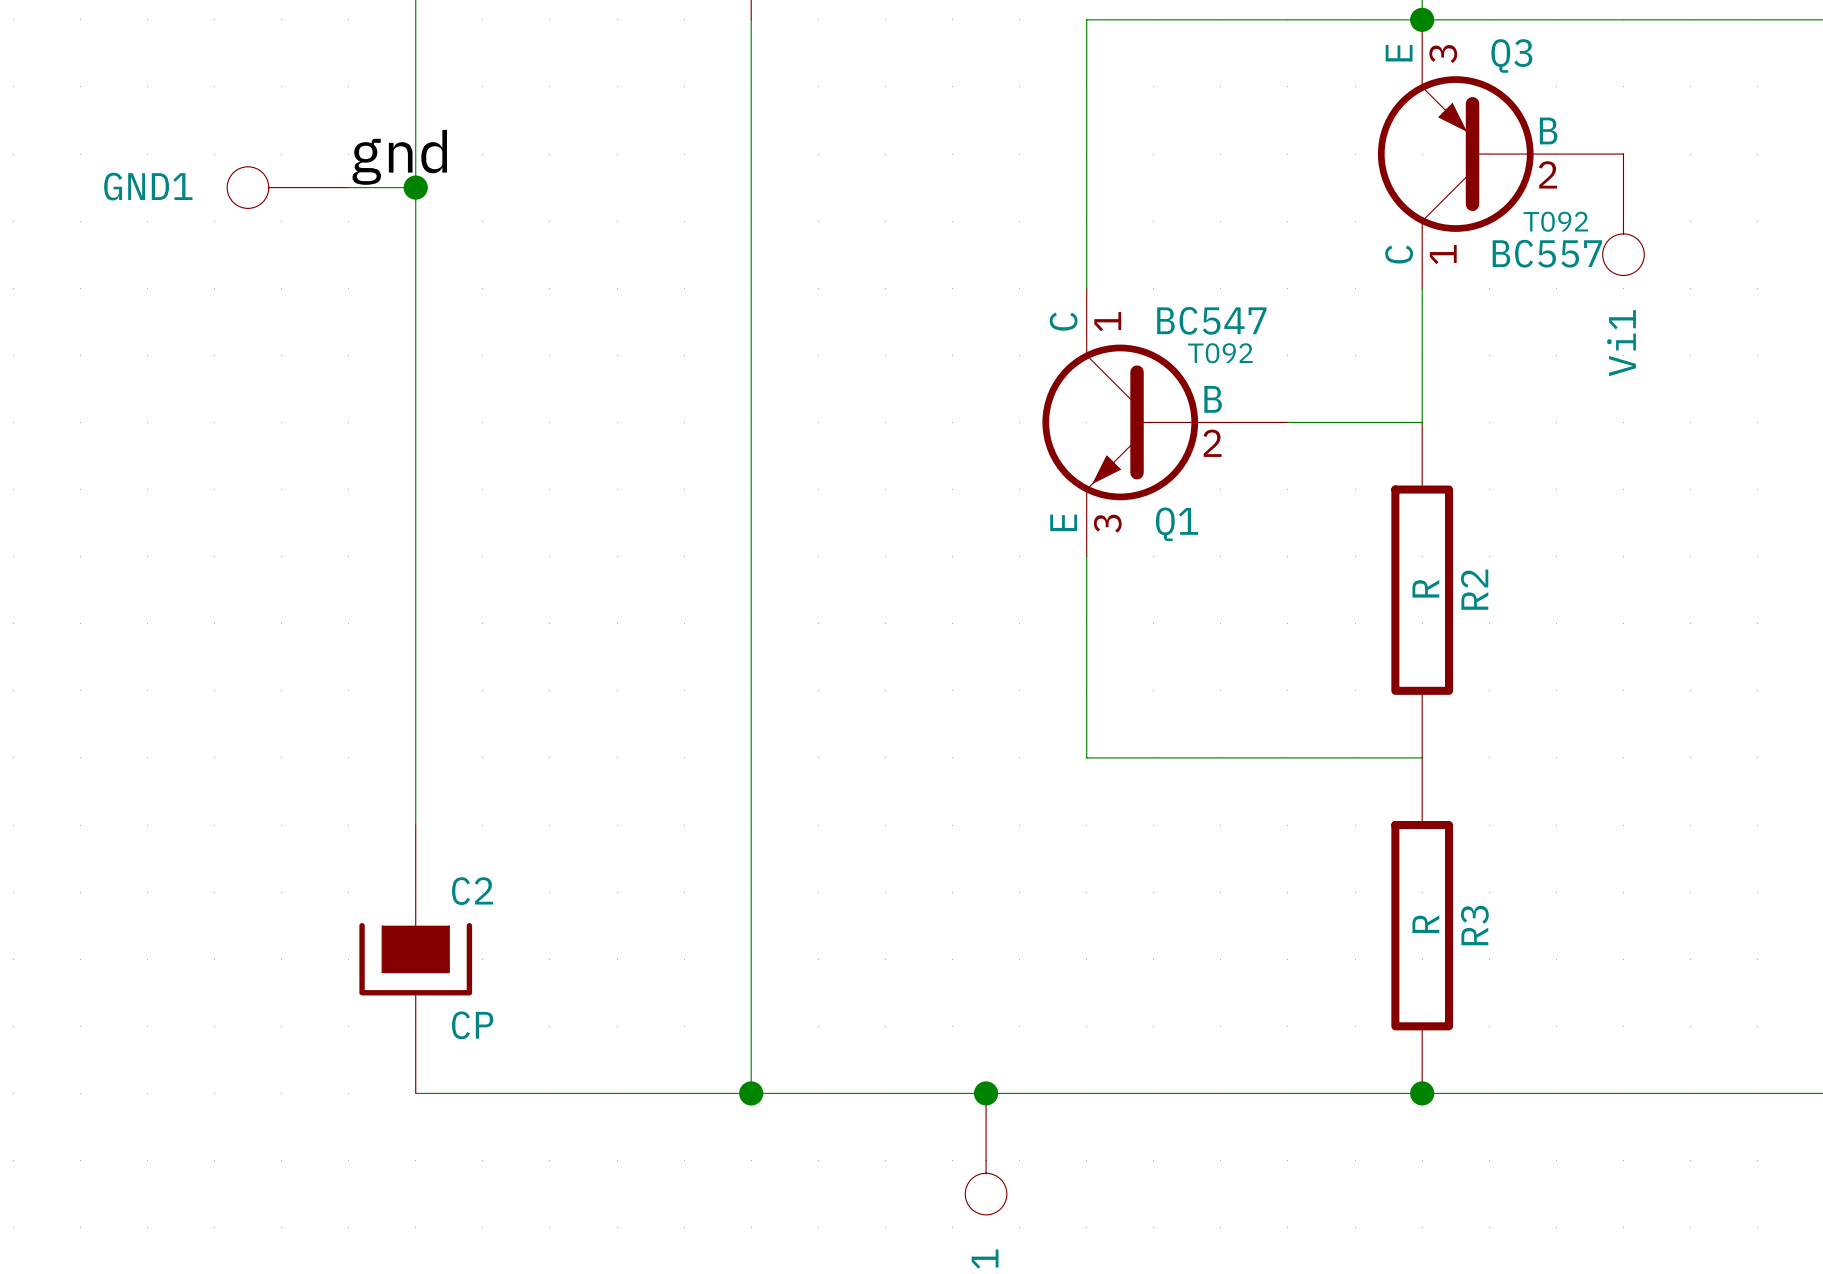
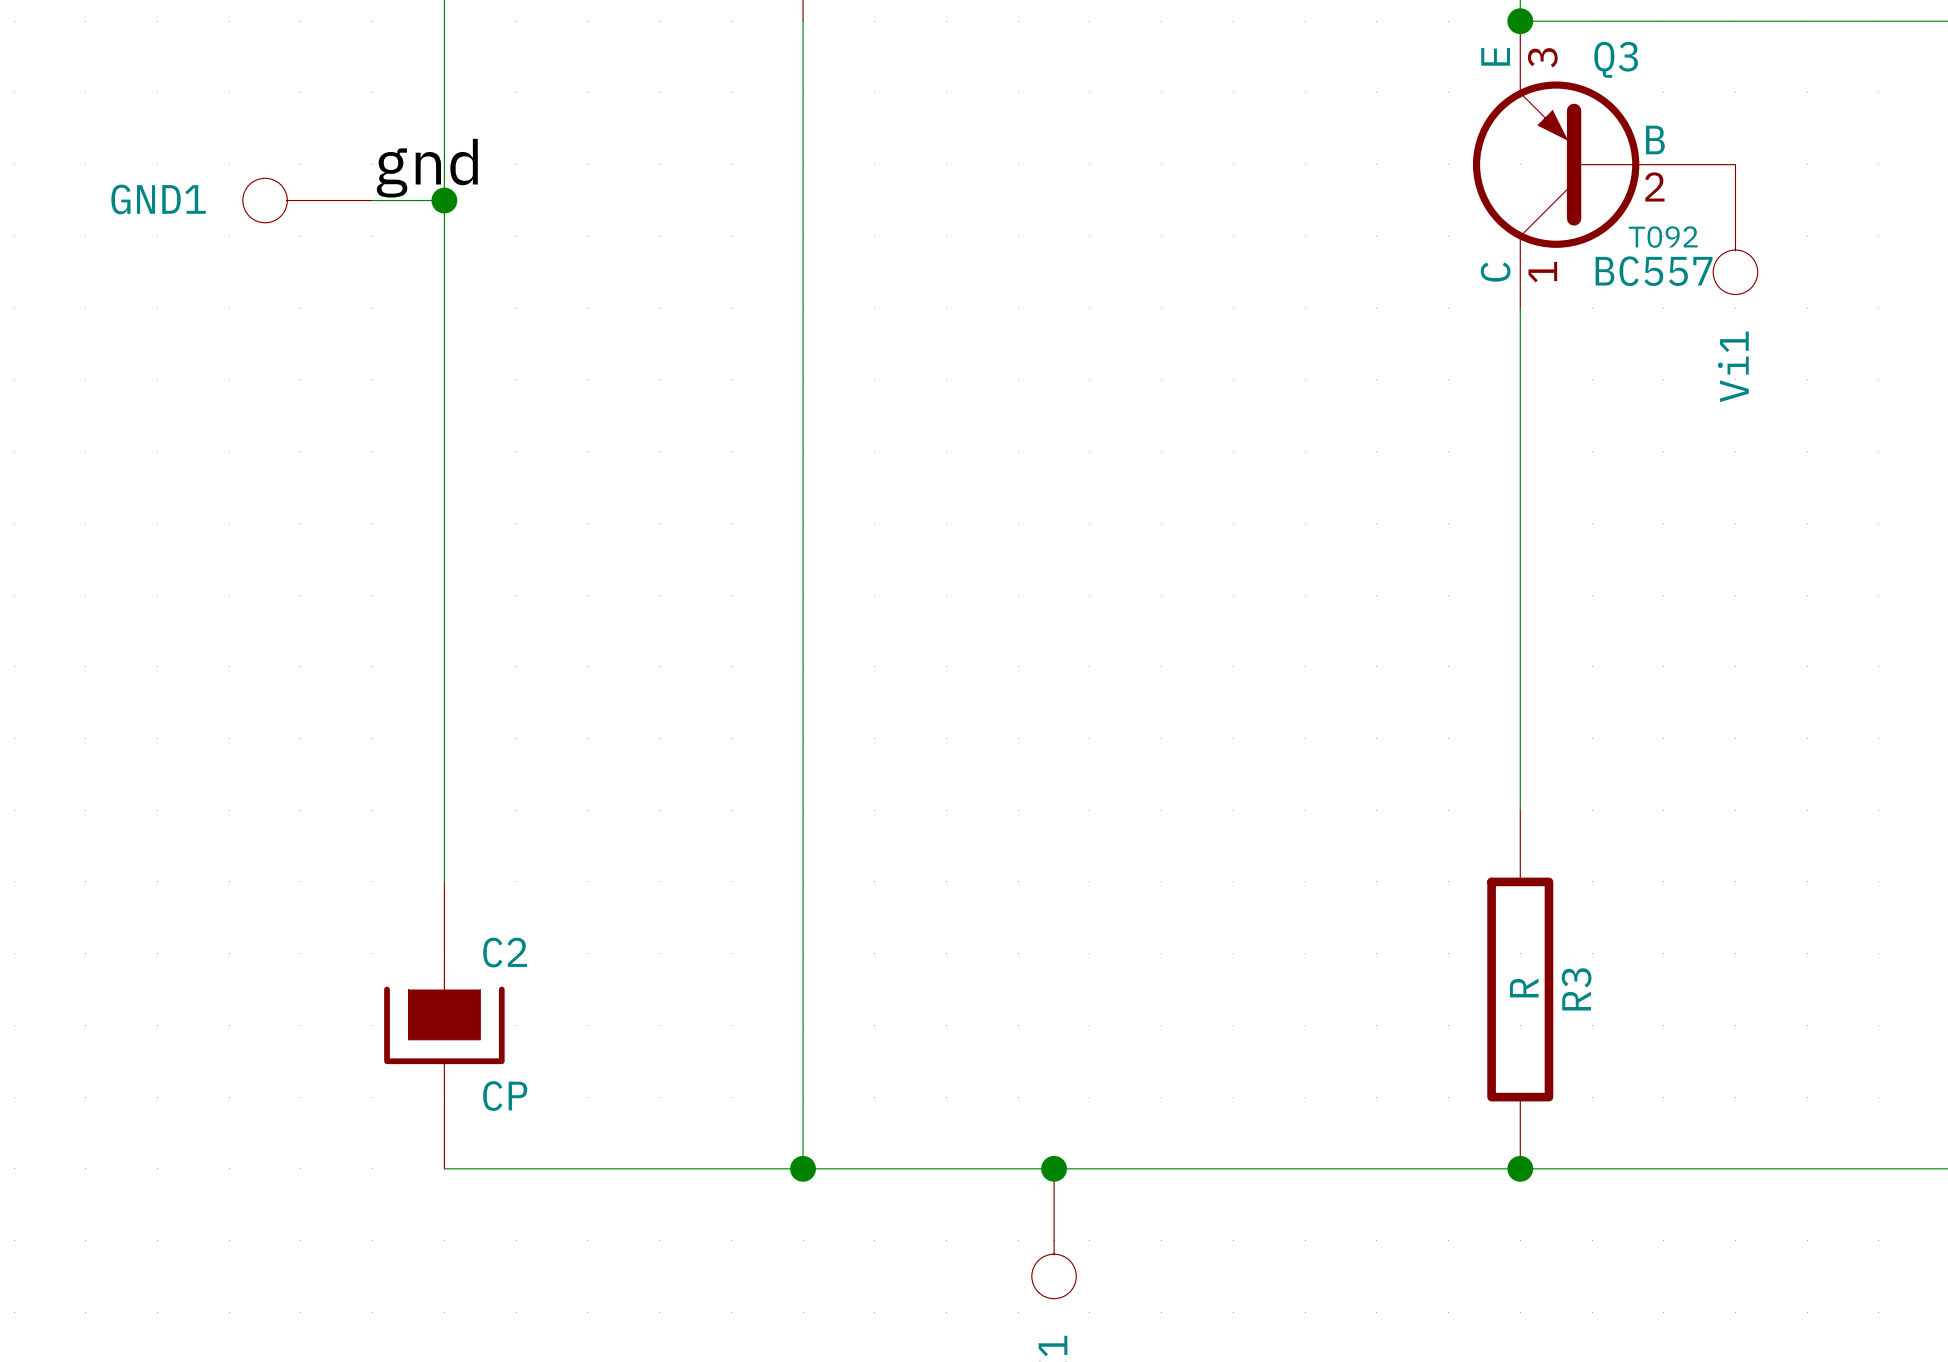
wire: (1422, 19) (1086, 19) (1086, 288) -> none
Q1: BC547 (1165, 422) -> none
wire: (1287, 422) (1422, 422) -> none
wire: (1086, 556) (1086, 757) (1422, 757) -> (1520, 451) (1520, 810)
R2: R (1422, 590) -> none

